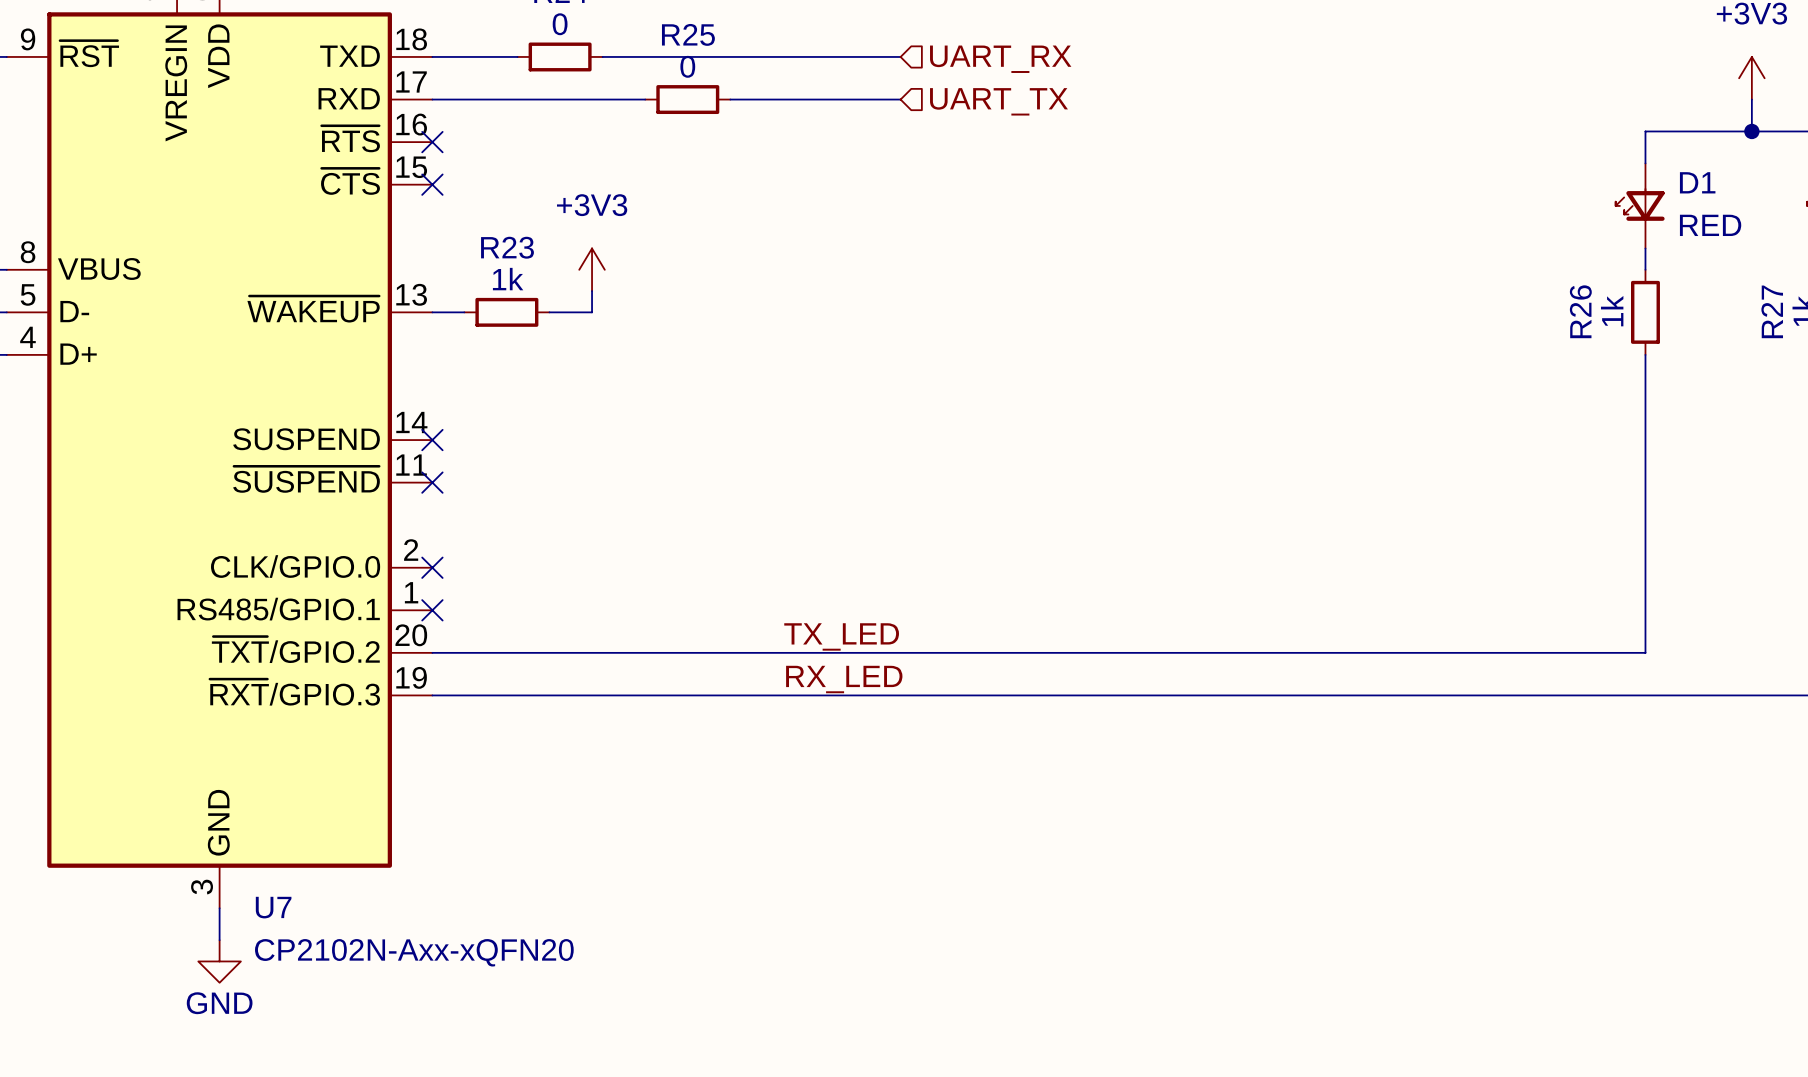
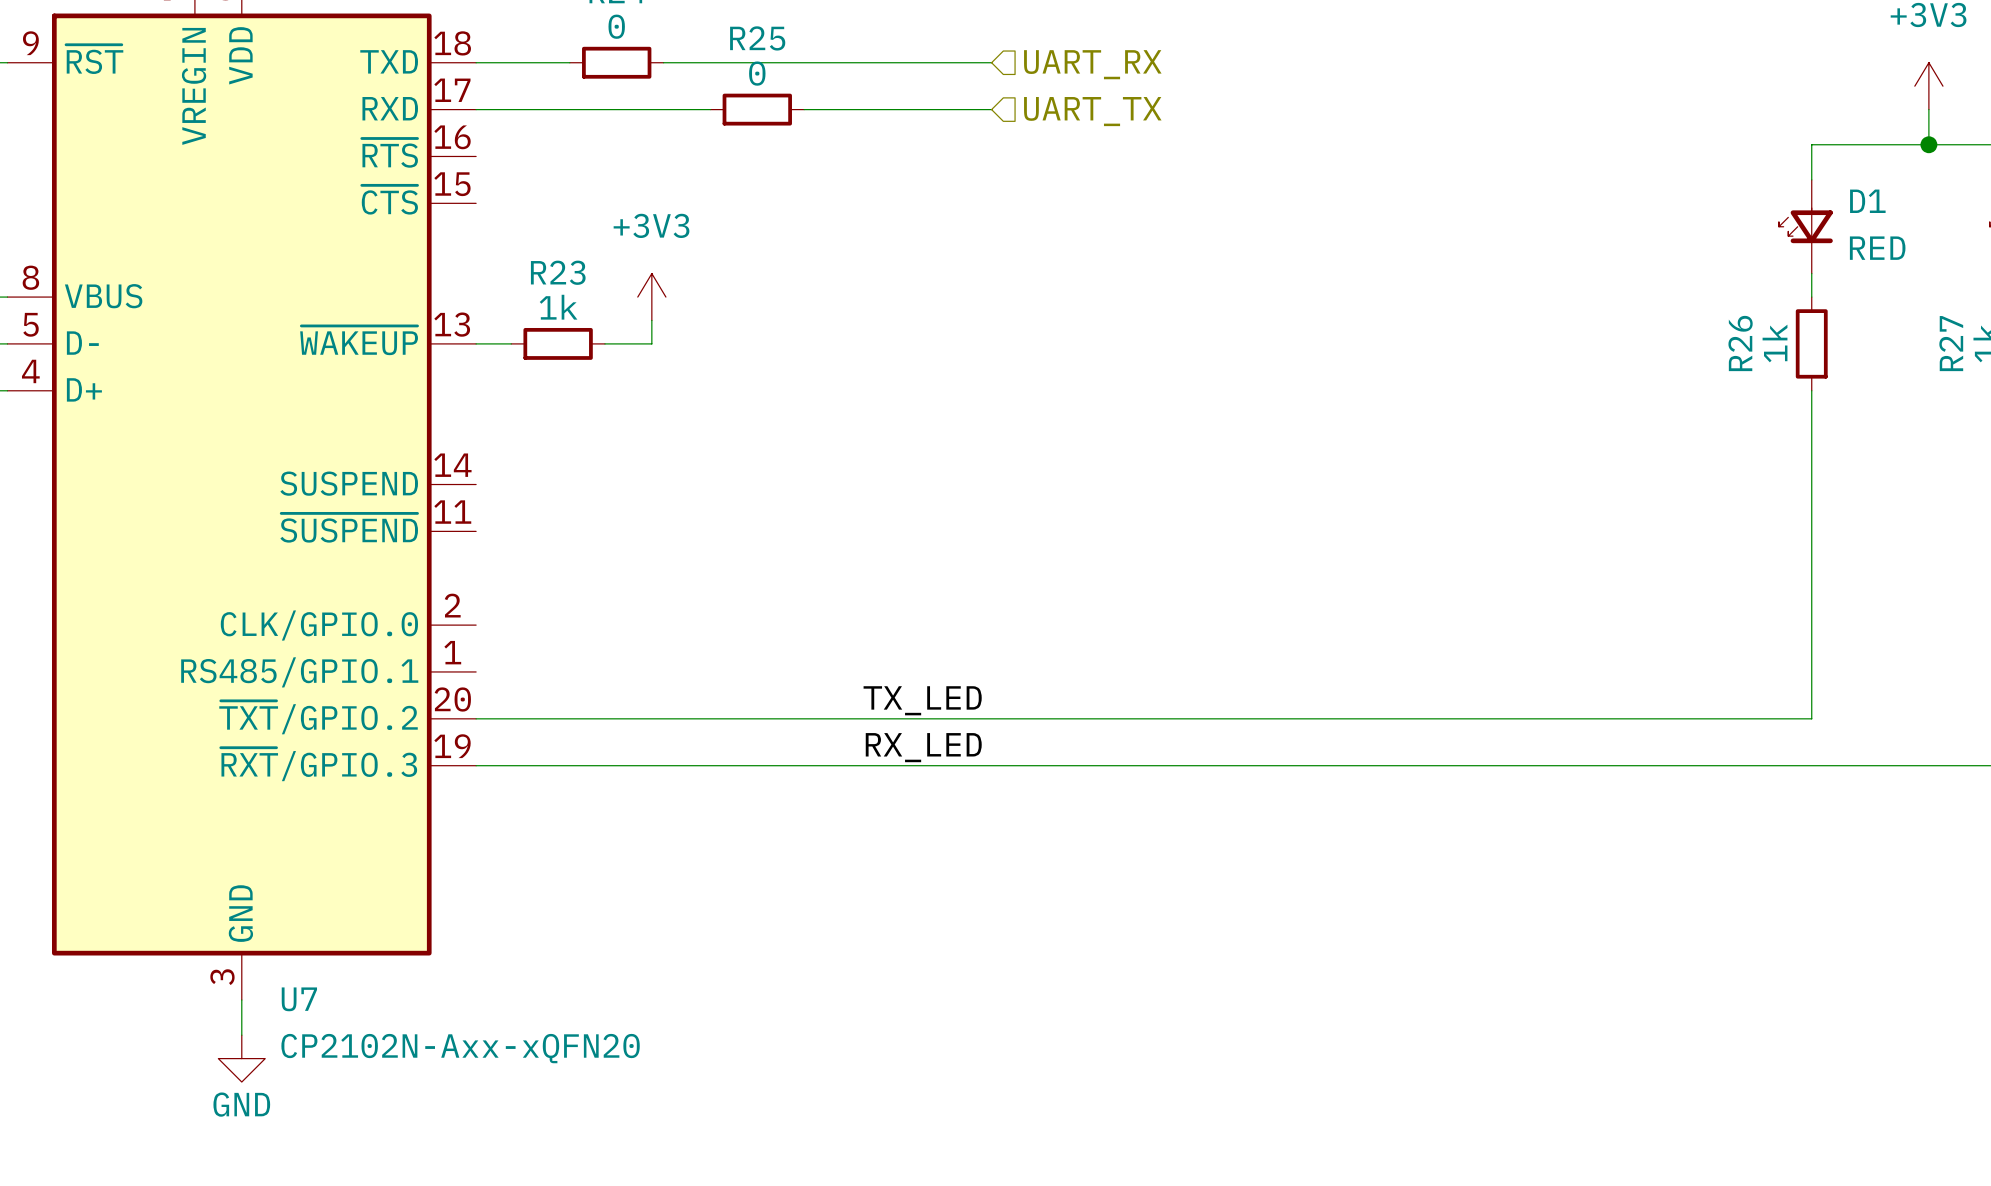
no-connect mark: (432, 142) -> none
no-connect mark: (432, 184) -> none
no-connect mark: (432, 440) -> none
no-connect mark: (432, 482) -> none
no-connect mark: (432, 567) -> none
no-connect mark: (432, 610) -> none

